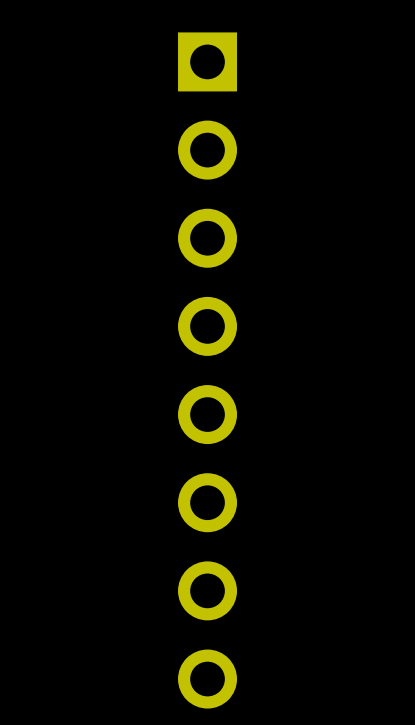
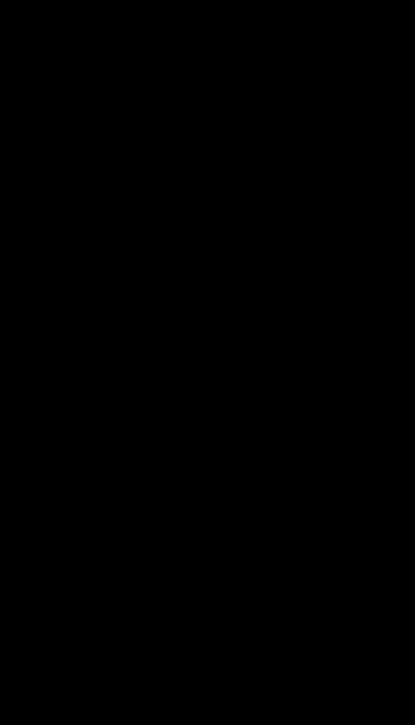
part: (207, 370) -> none

